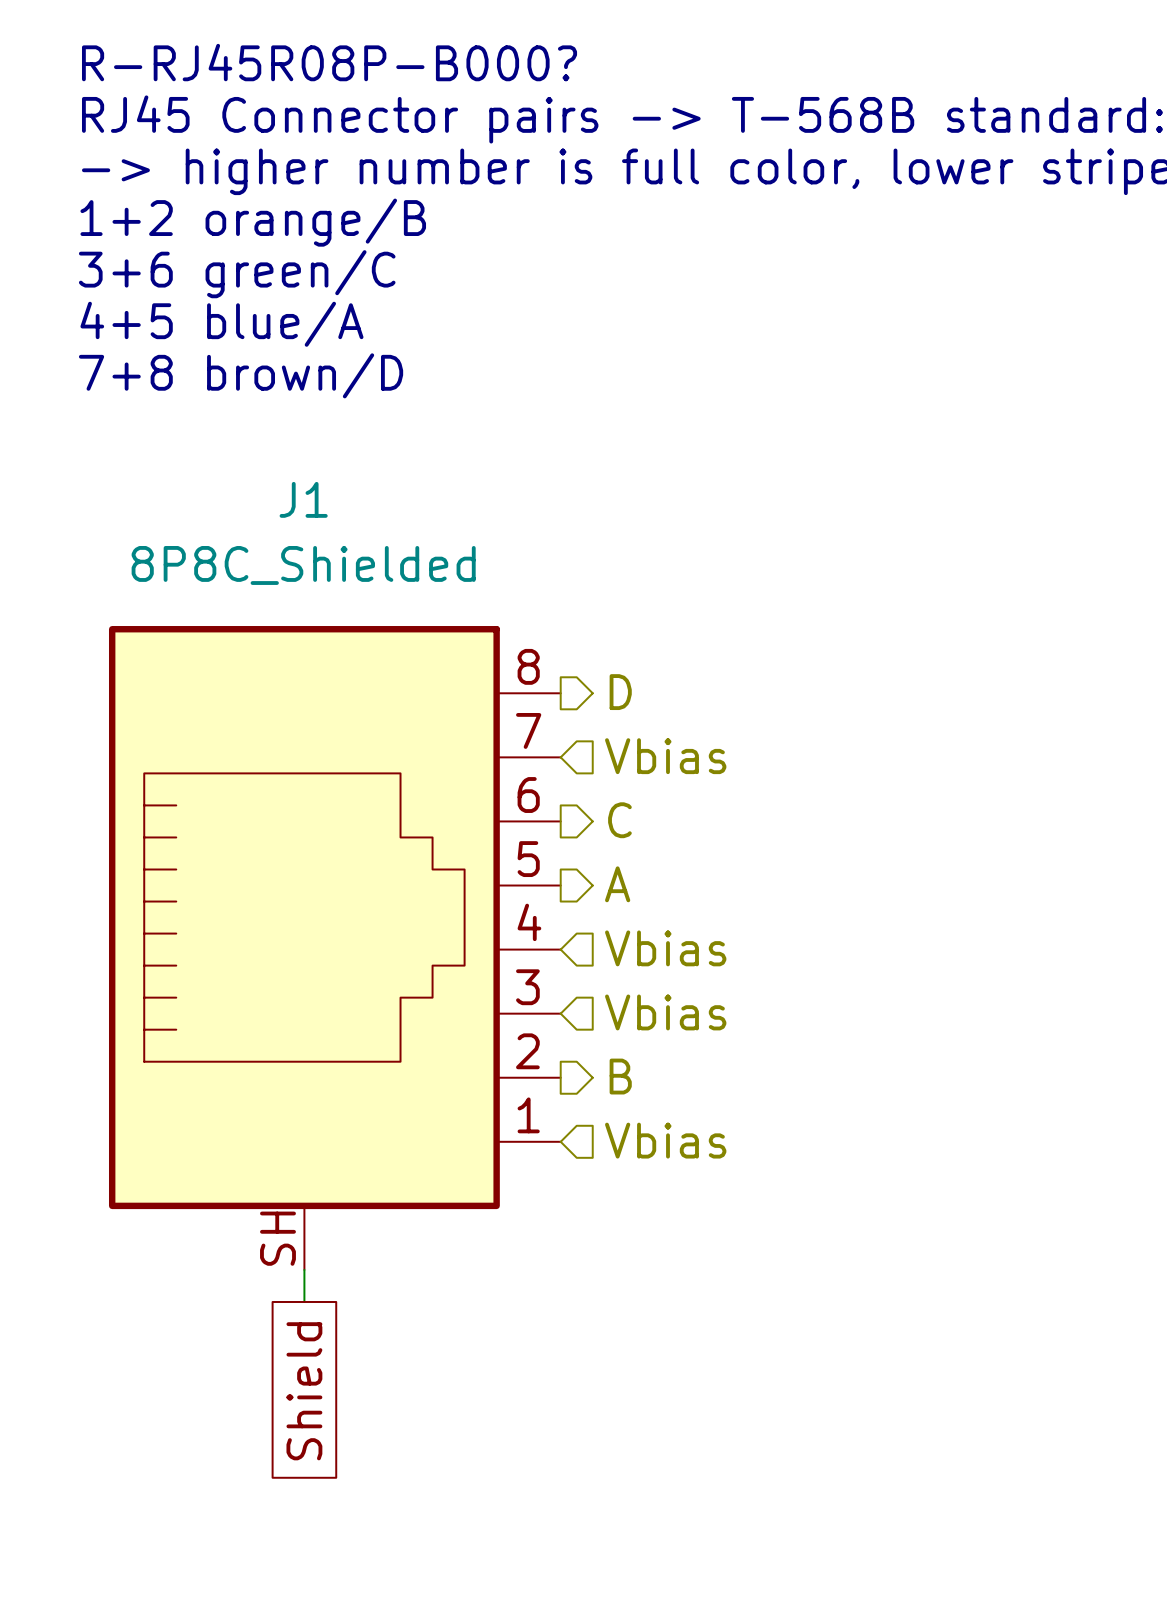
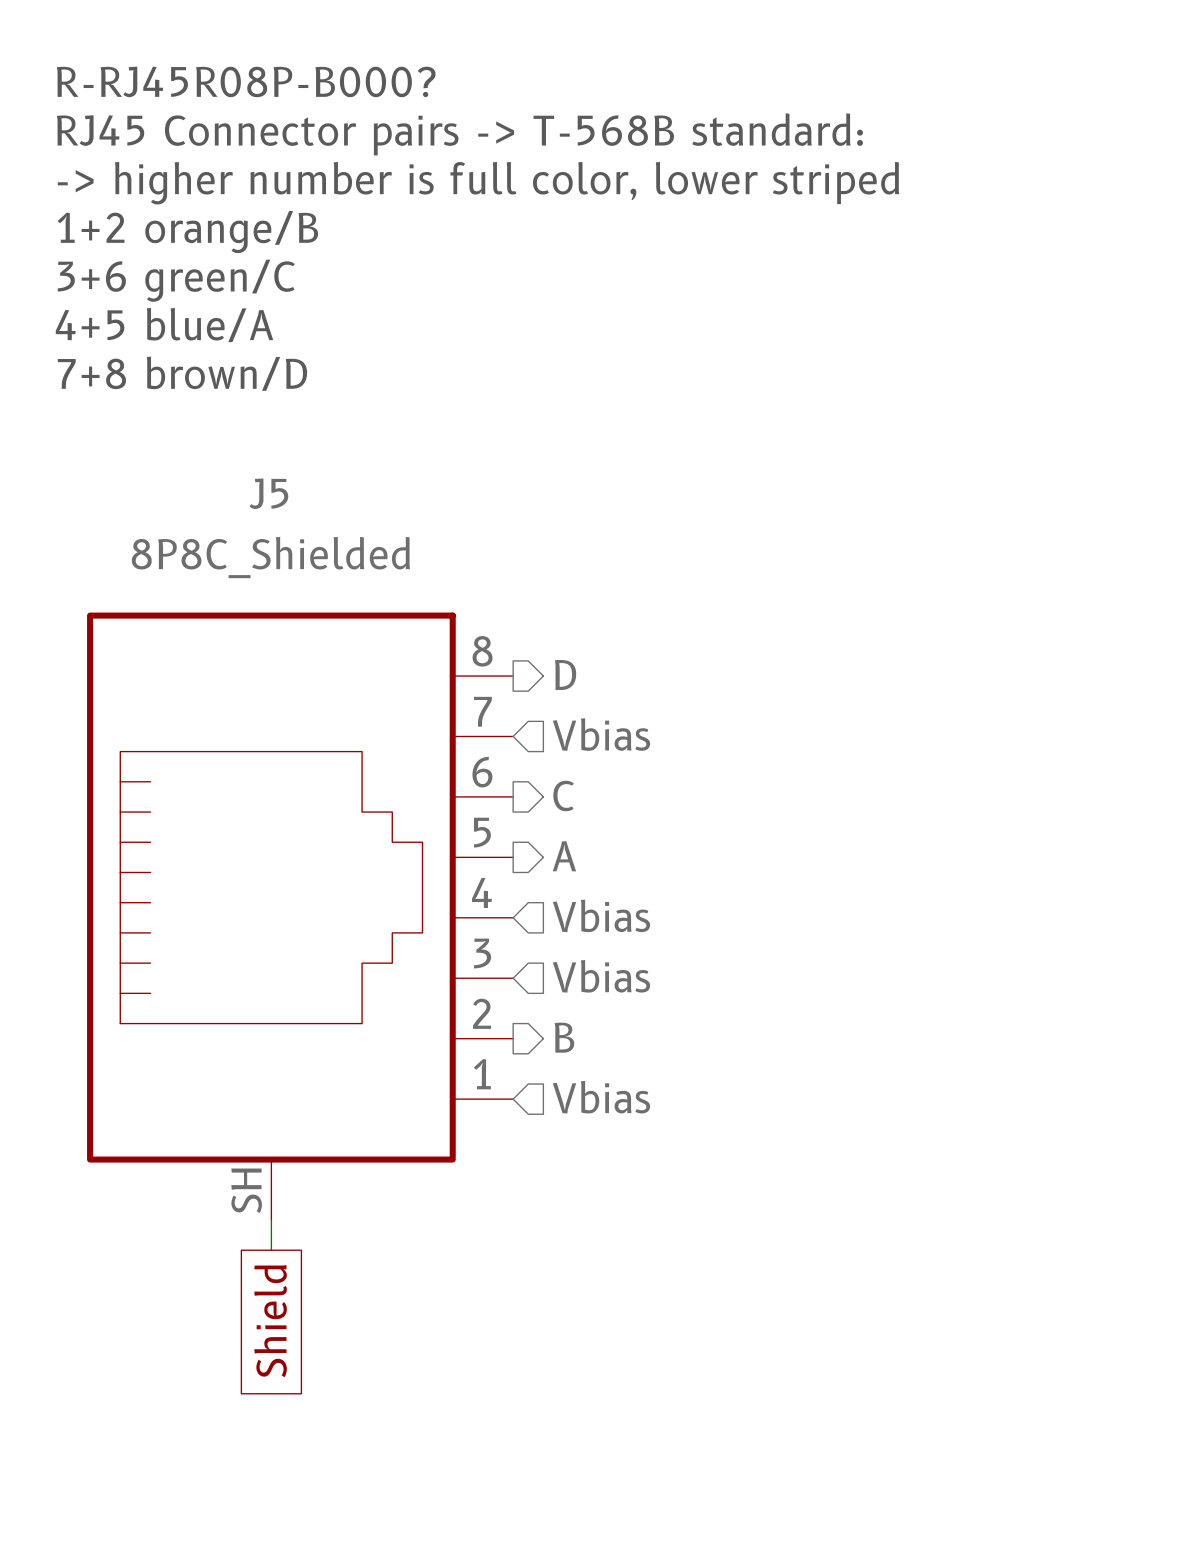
J1 name: J1 (303, 499) -> J5 (268, 493)

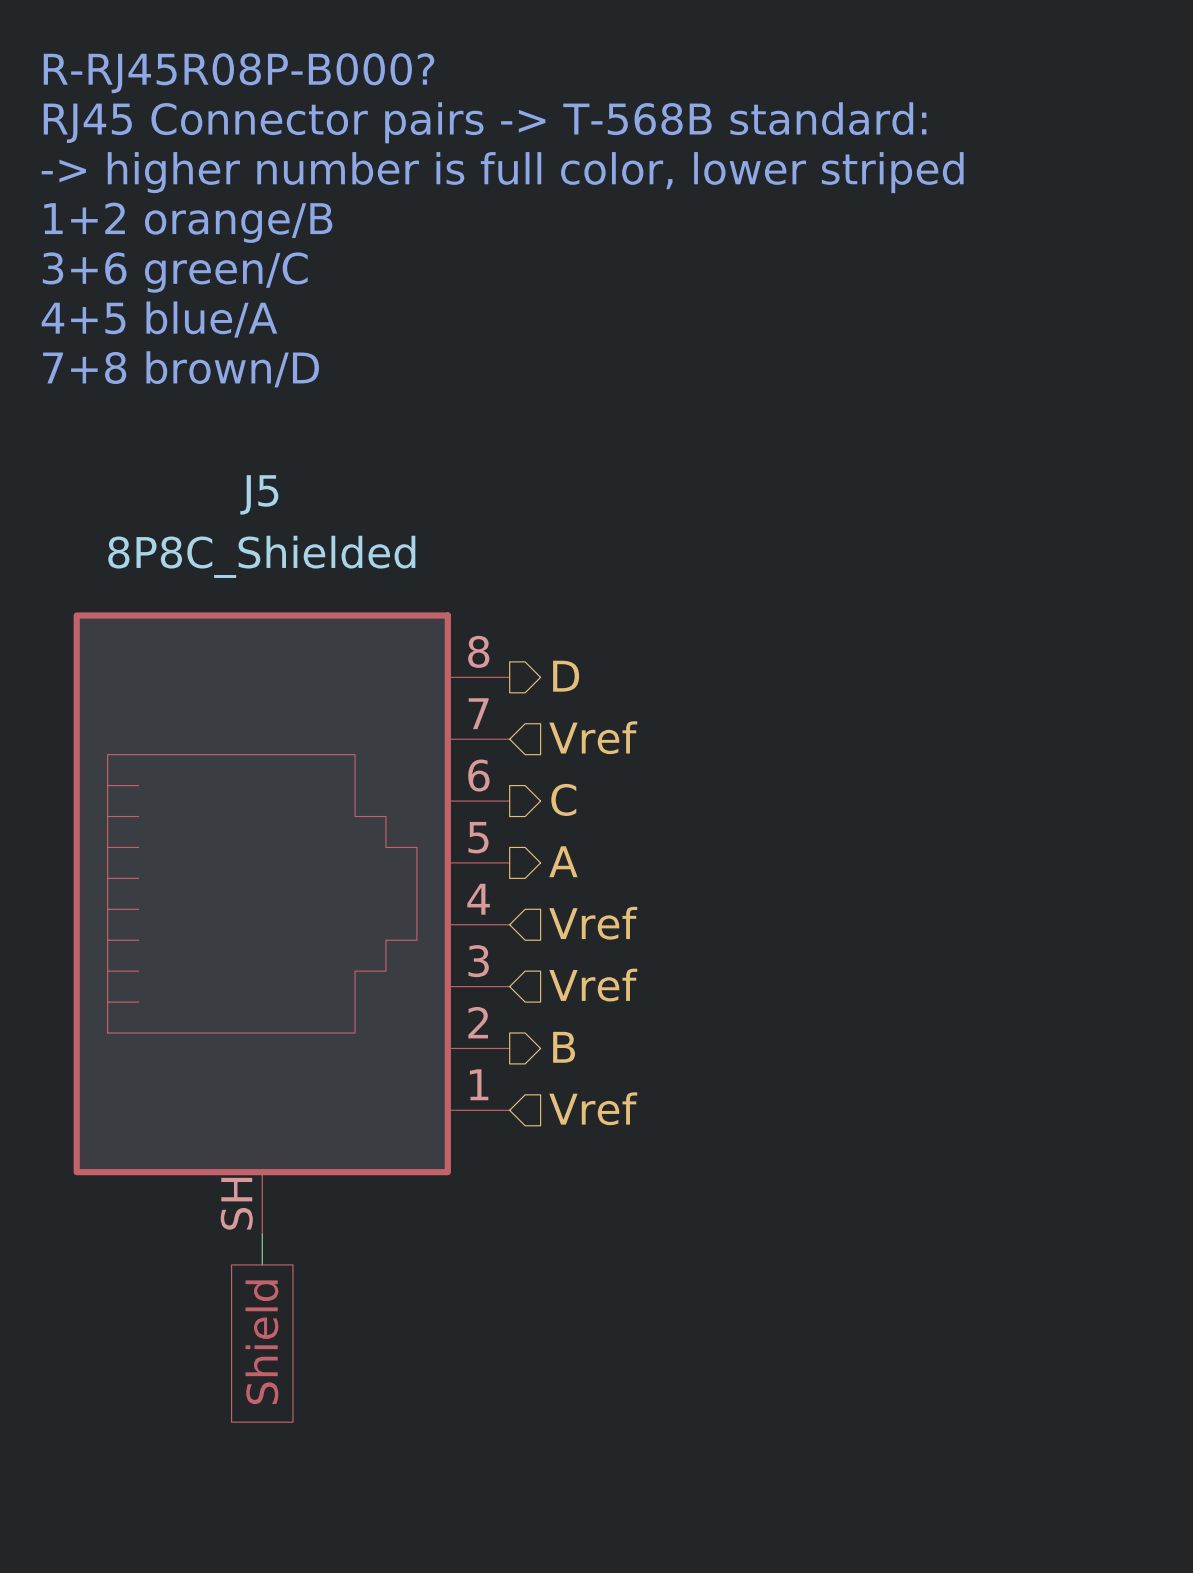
hierarchical label: Vbias (601, 734) -> Vref (593, 737)
hierarchical label: Vbias (601, 915) -> Vref (593, 923)
hierarchical label: Vbias (601, 976) -> Vref (593, 985)
hierarchical label: Vbias (601, 1097) -> Vref (593, 1108)

